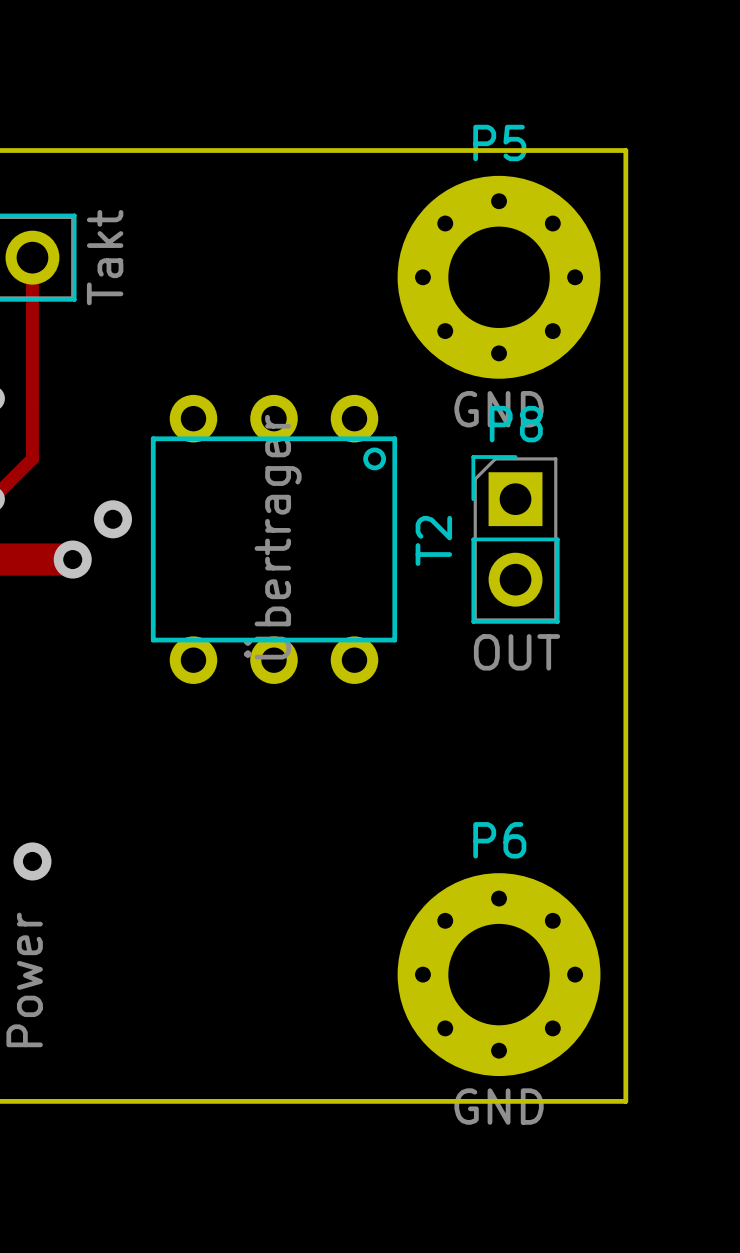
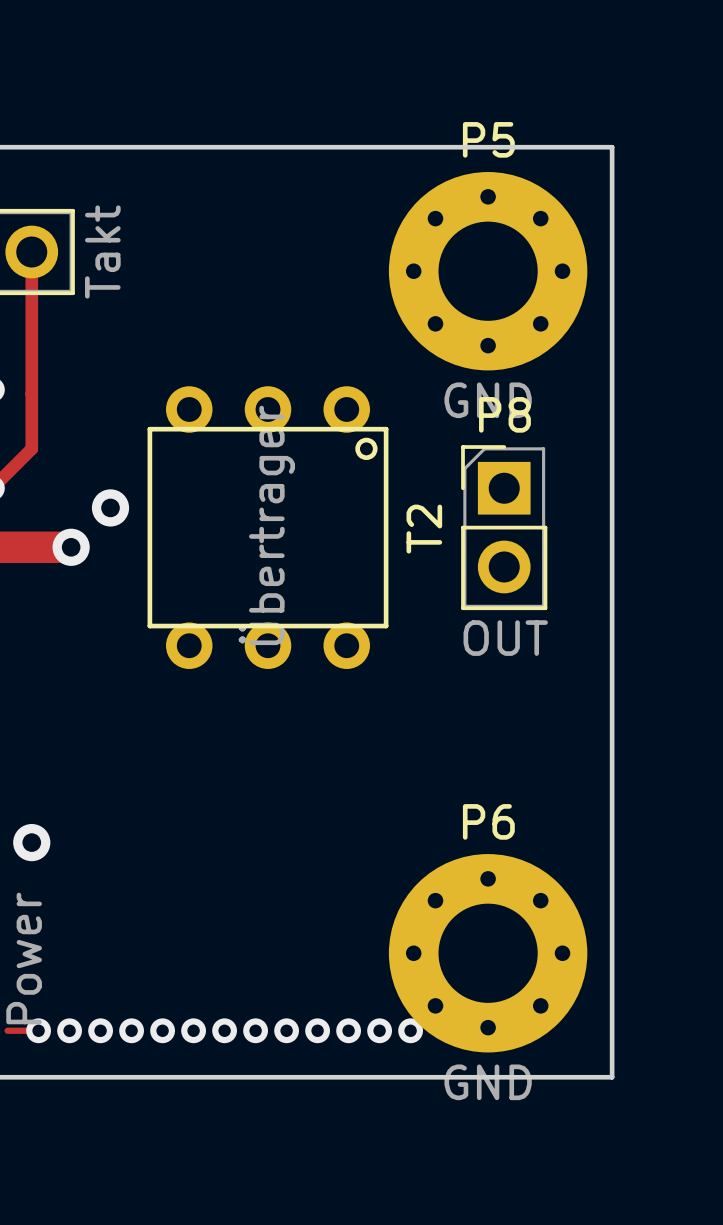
track: none -> (7, 1030) (38, 1030)
via: none -> (38, 1030)
via: none -> (69, 1030)
via: none -> (100, 1030)
via: none -> (131, 1030)
via: none -> (162, 1030)
via: none -> (193, 1030)
via: none -> (224, 1030)
via: none -> (255, 1030)
via: none -> (286, 1030)
via: none -> (317, 1030)
via: none -> (348, 1030)
via: none -> (379, 1030)
via: none -> (410, 1030)

